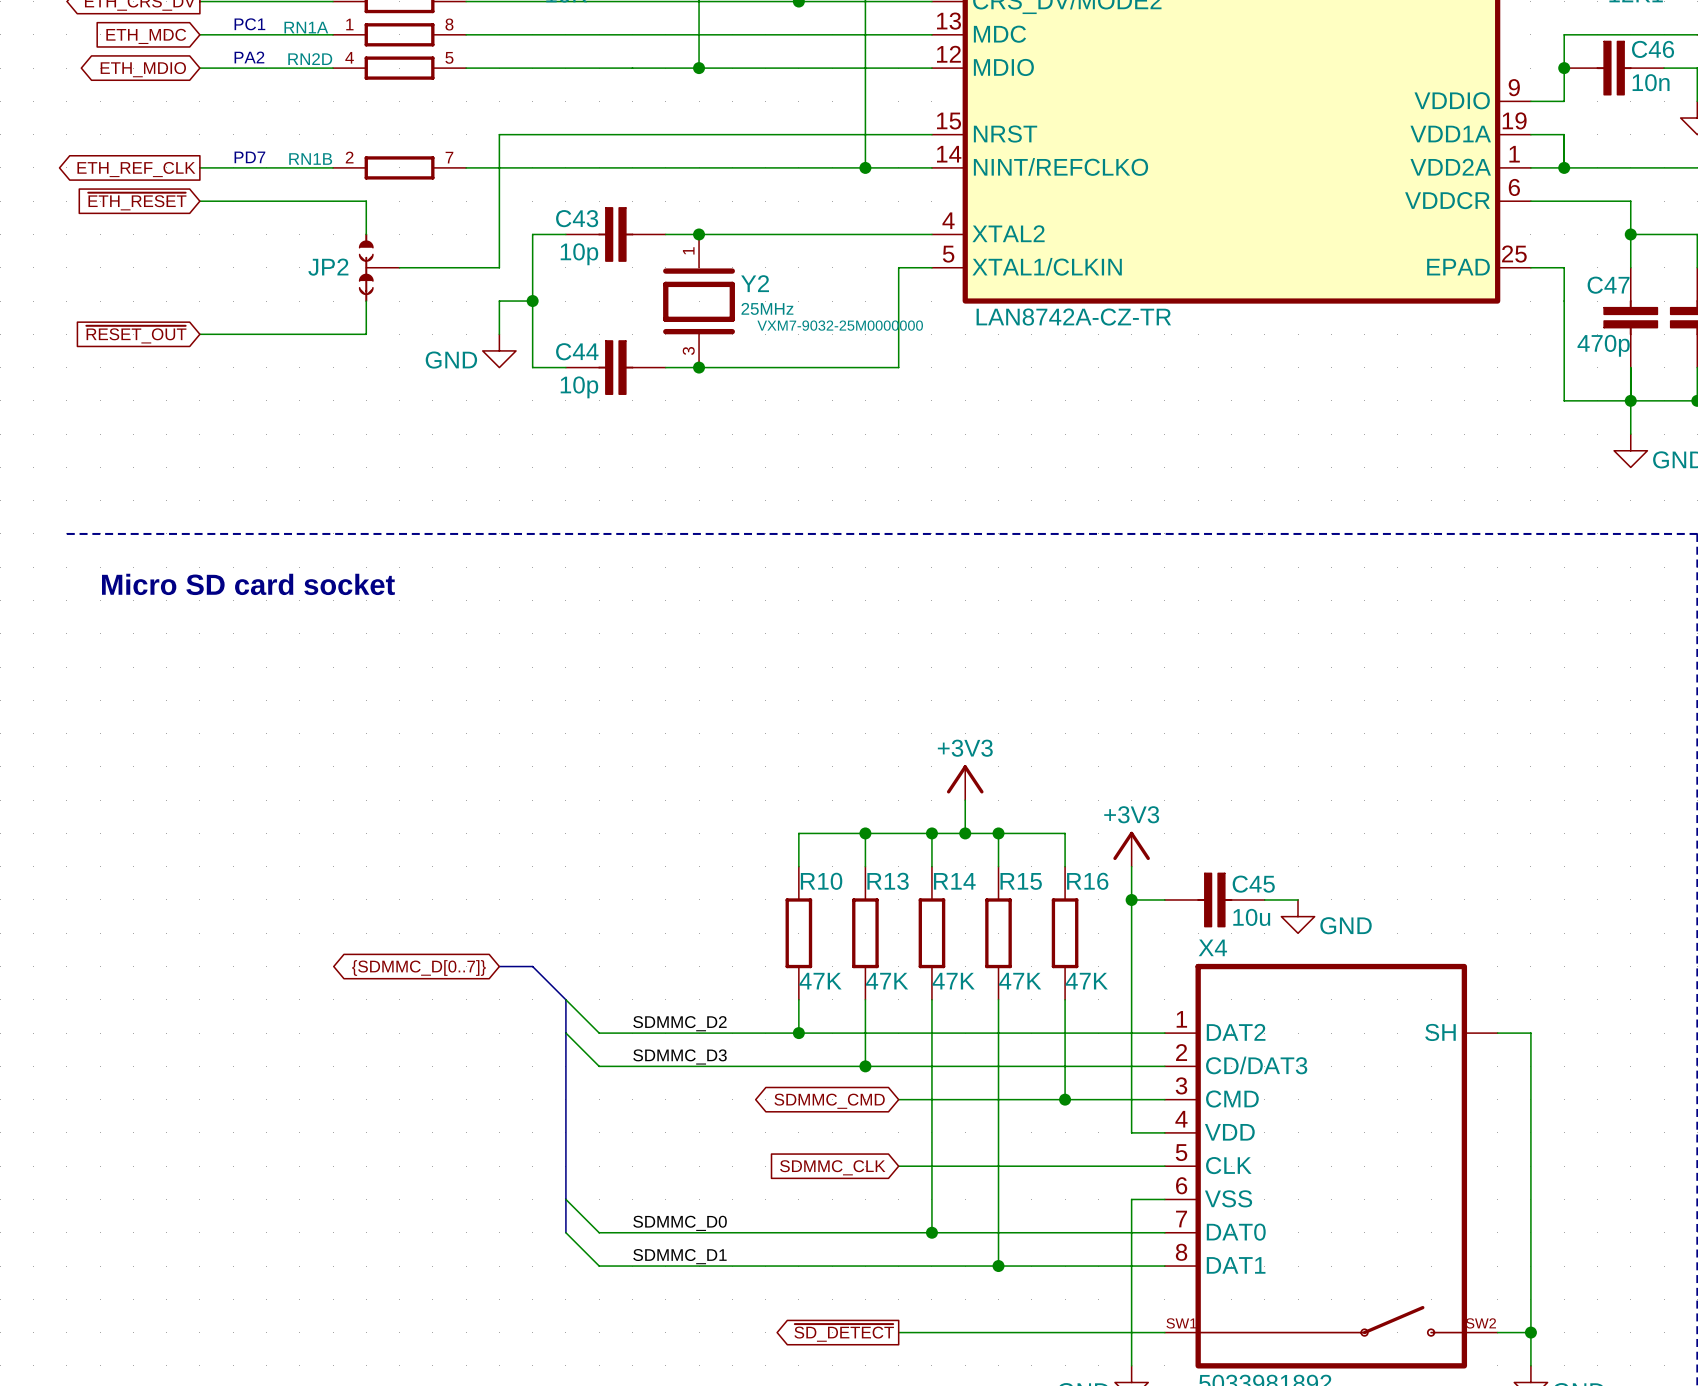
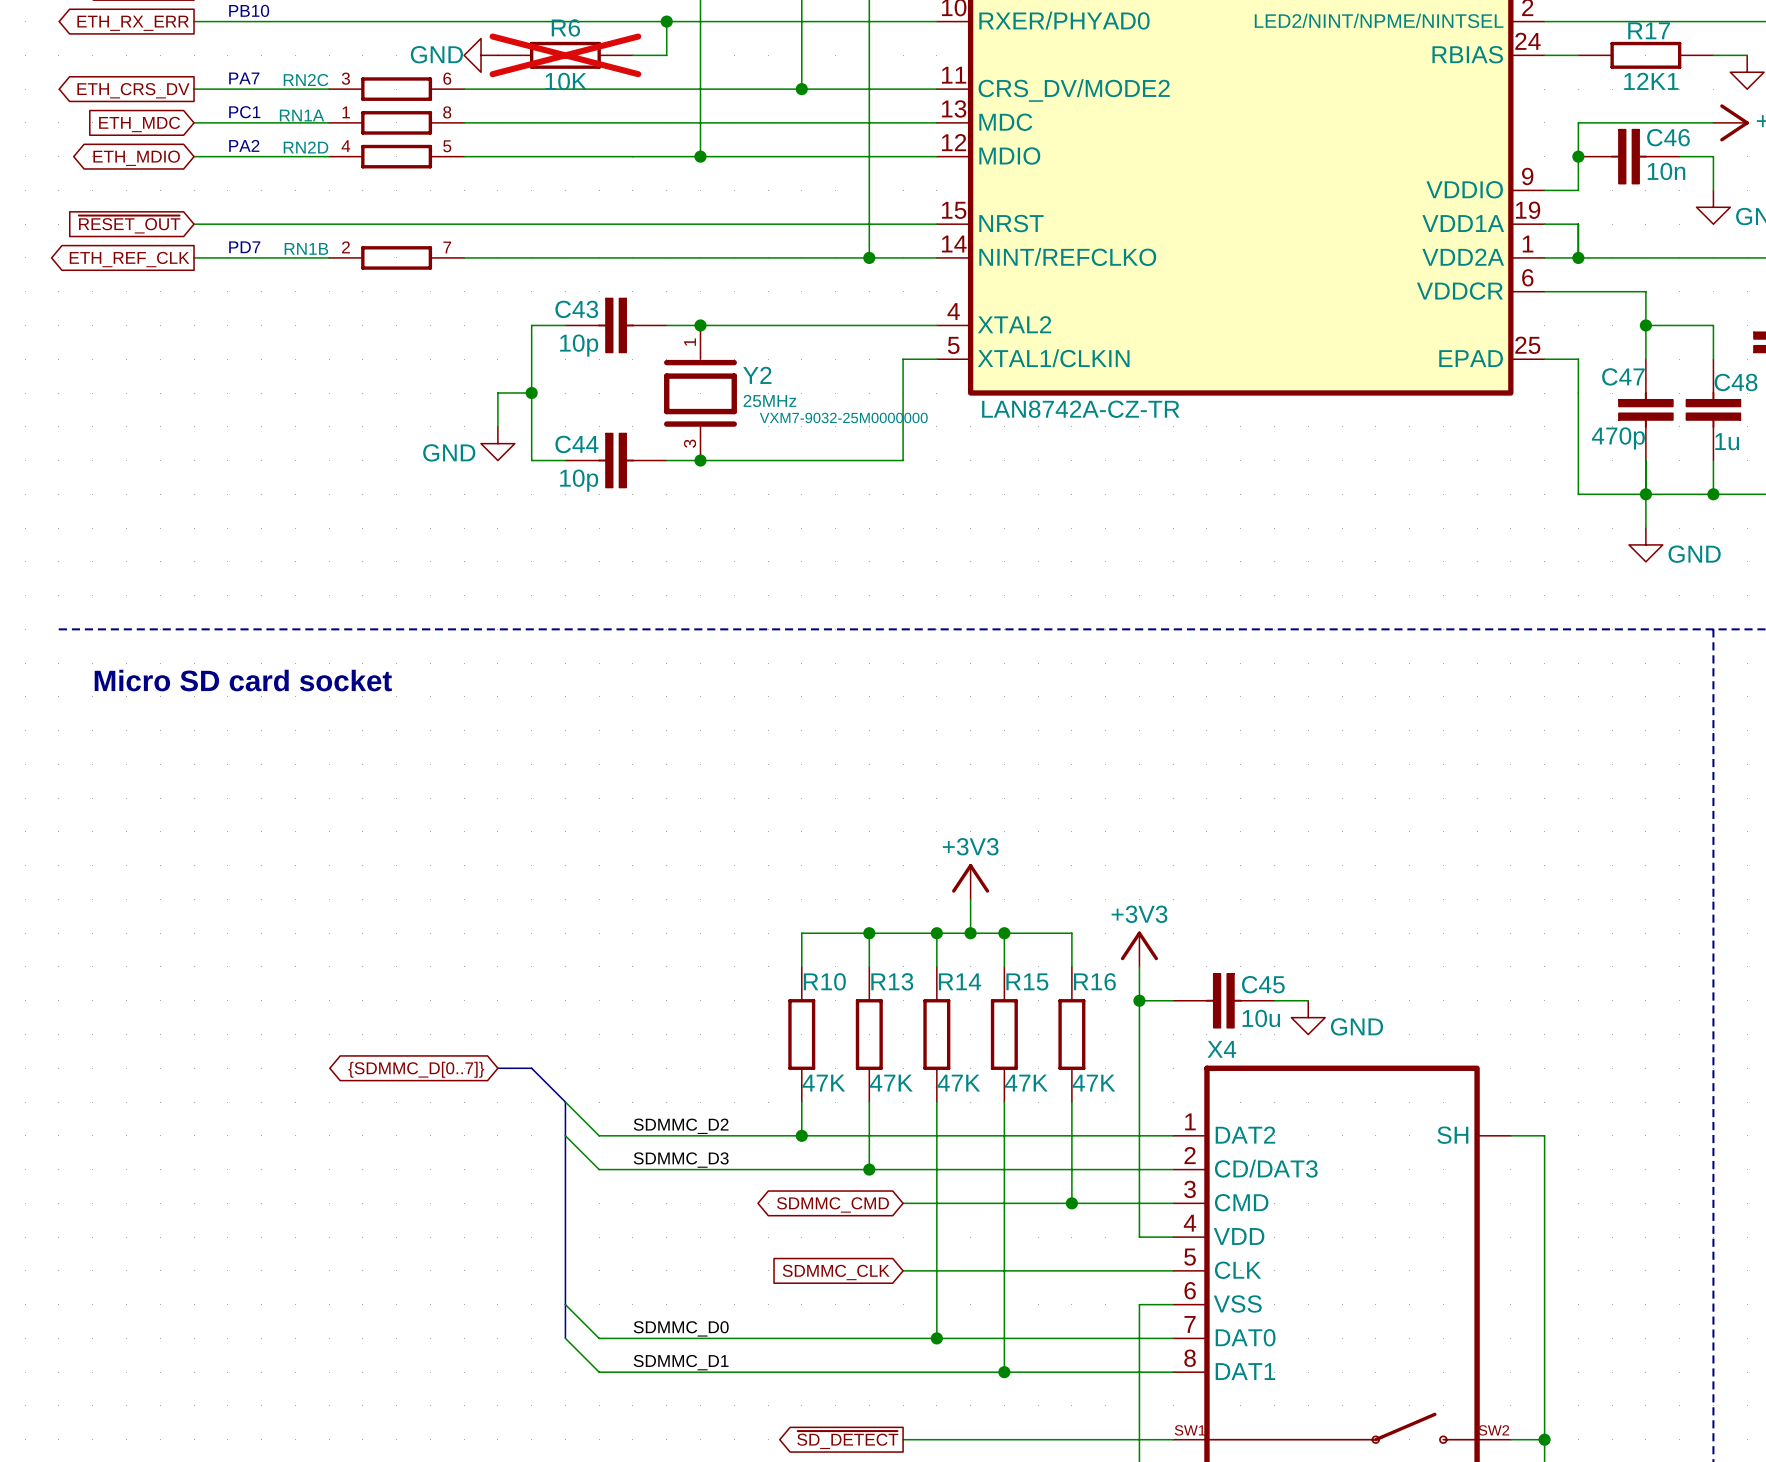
wire: (499, 134) (499, 267) (399, 267) -> (497, 224) (194, 224)
global label: ~{ETH_RESET} (137, 201) -> none
wire: (199, 201) (366, 201) (366, 234) -> none
JP2: (379, 267) -> none
wire: (366, 301) (366, 334) (199, 334) -> none
global label position: ~{RESET_OUT} (136, 334) -> ~{RESET_OUT} (129, 224)

